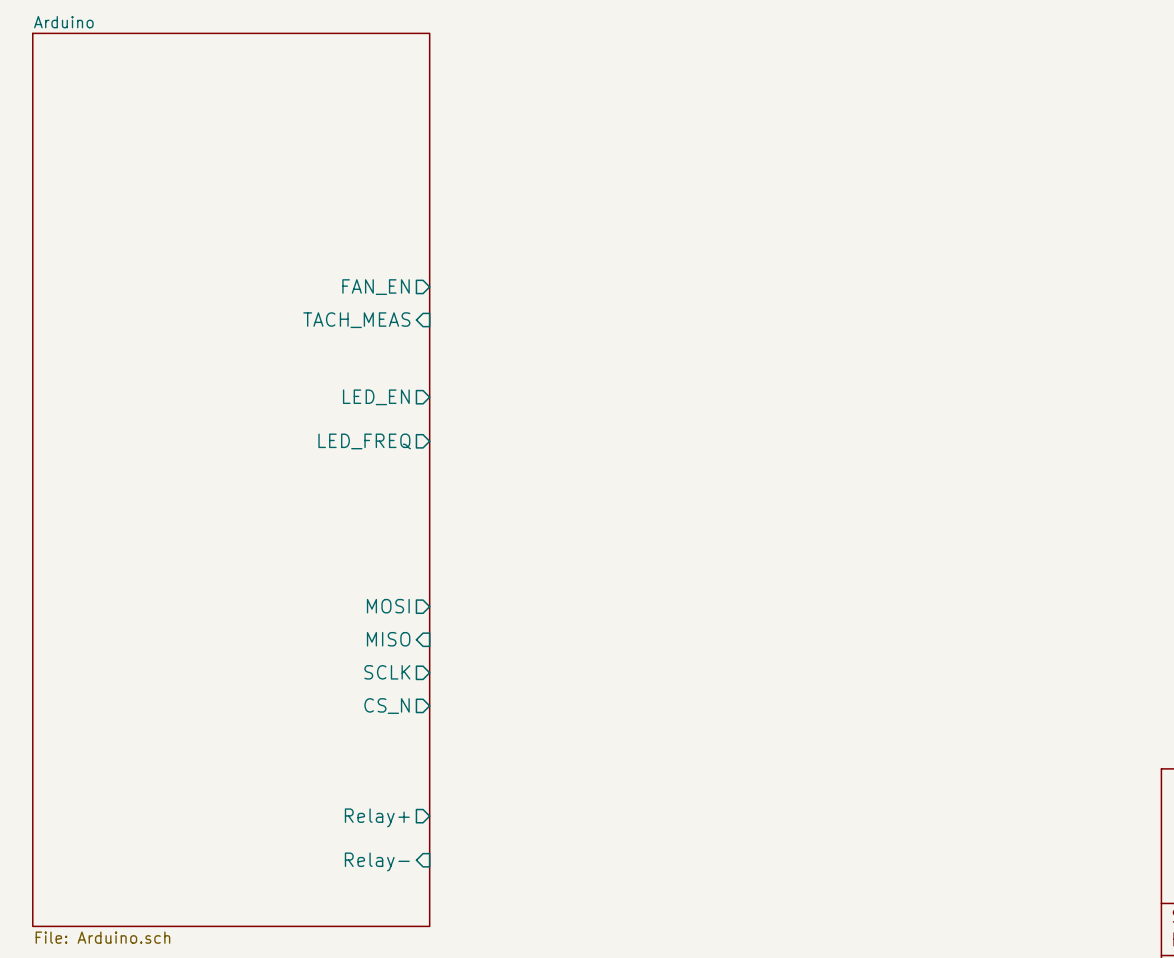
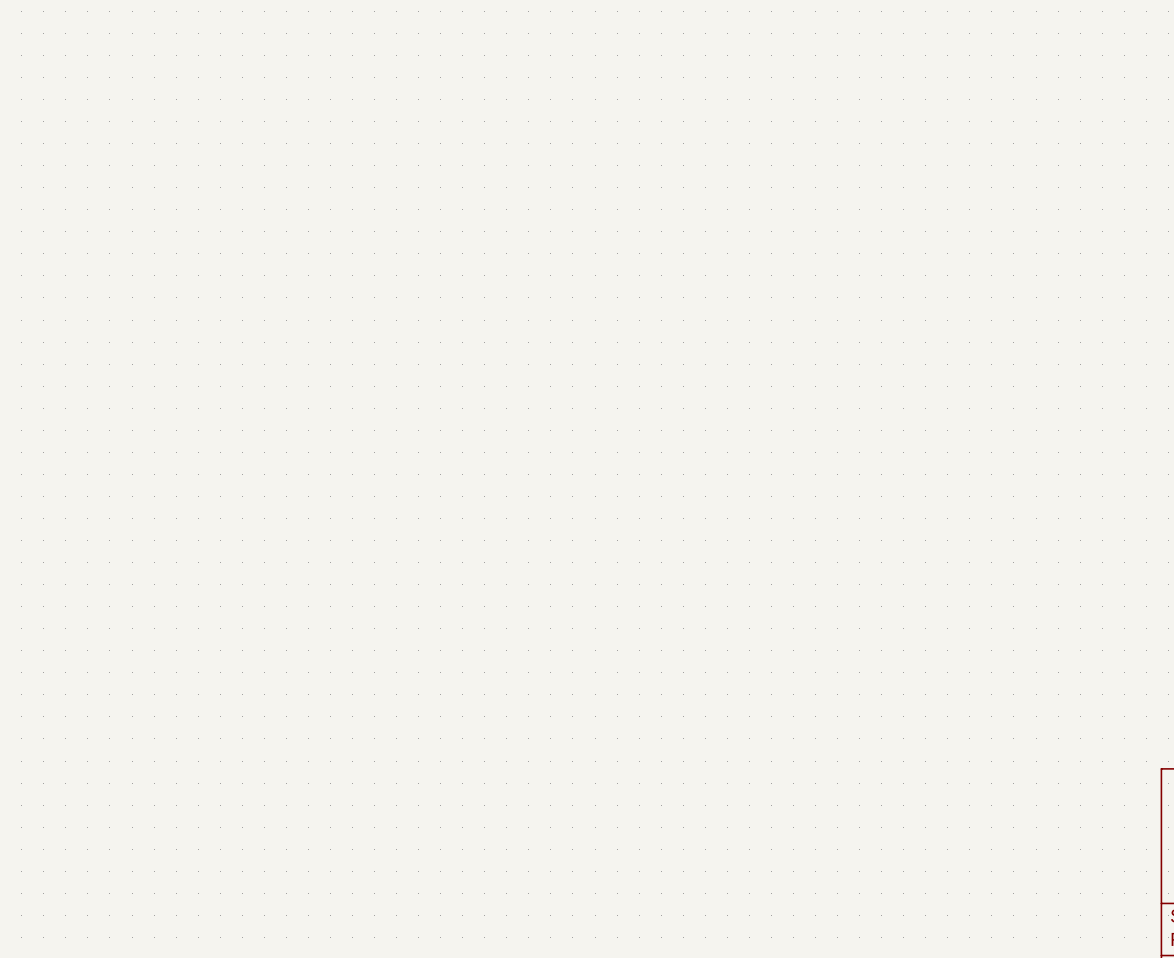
sheet pin: FAN_EN (376, 287) -> none
sheet pin: TACH_MEAS (356, 320) -> none
sheet pin: LED_EN (376, 397) -> none
sheet pin: LED_FREQ (364, 441) -> none
sheet Arduino: File: Arduino.sch (231, 479) -> none
sheet pin: MOSI (388, 606) -> none
sheet pin: MISO (388, 639) -> none
sheet pin: SCLK (387, 672) -> none
sheet pin: CS_N (387, 706) -> none
sheet pin: Relay+ (377, 817) -> none
sheet pin: Relay- (377, 861) -> none

